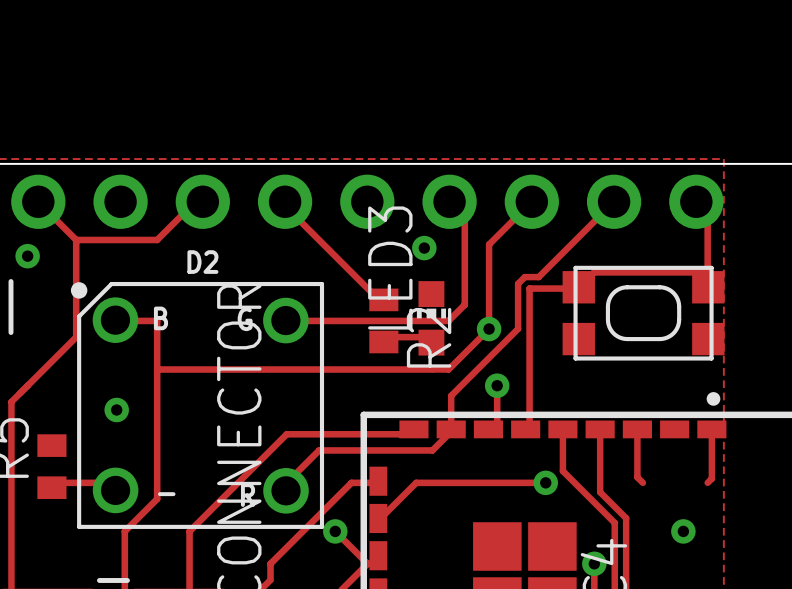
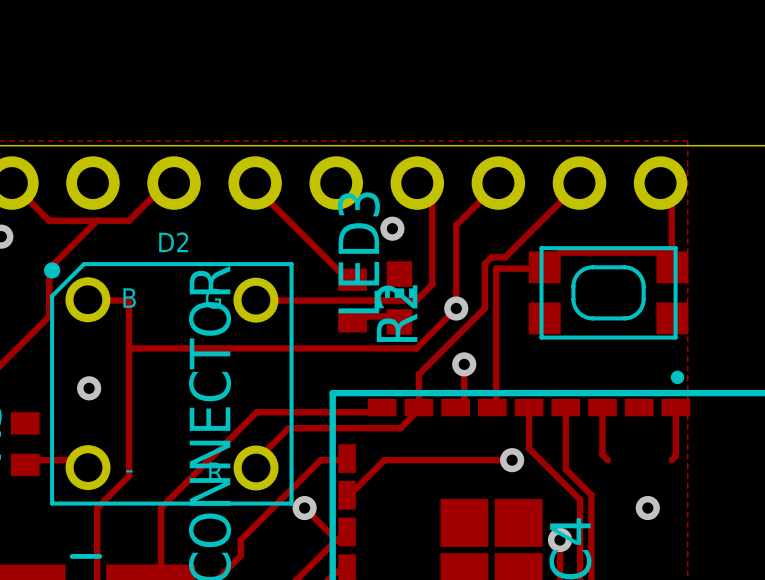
track: (76, 239) (76, 288) -> (97, 220) (49, 268)

